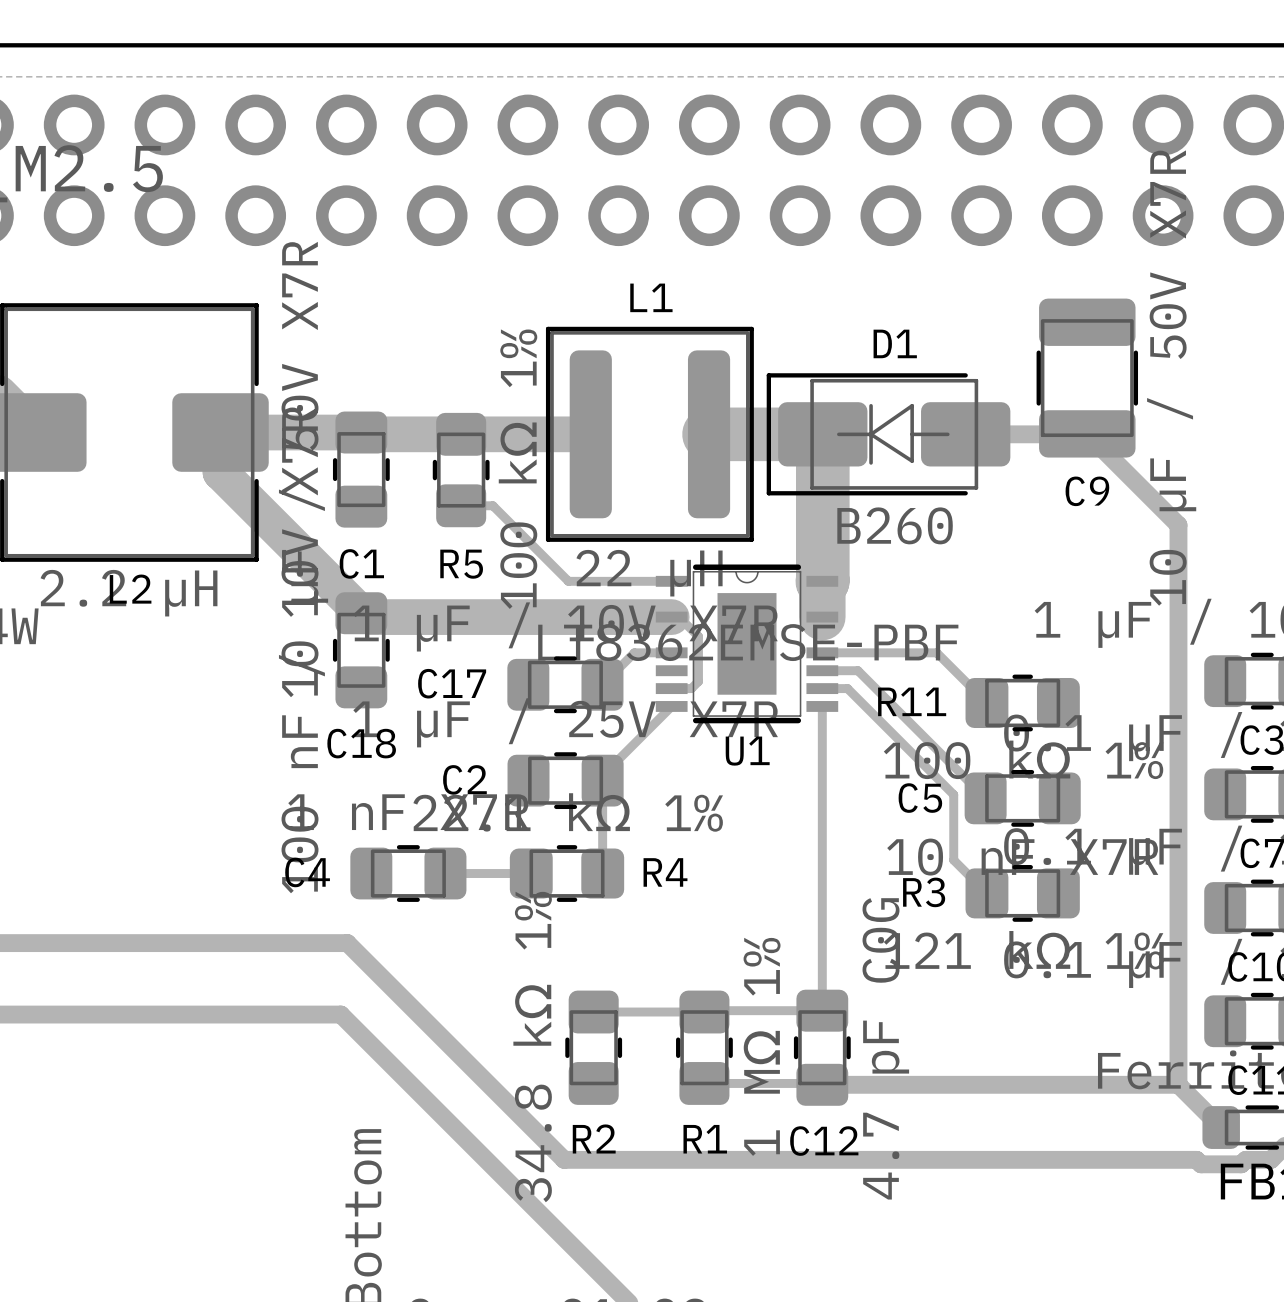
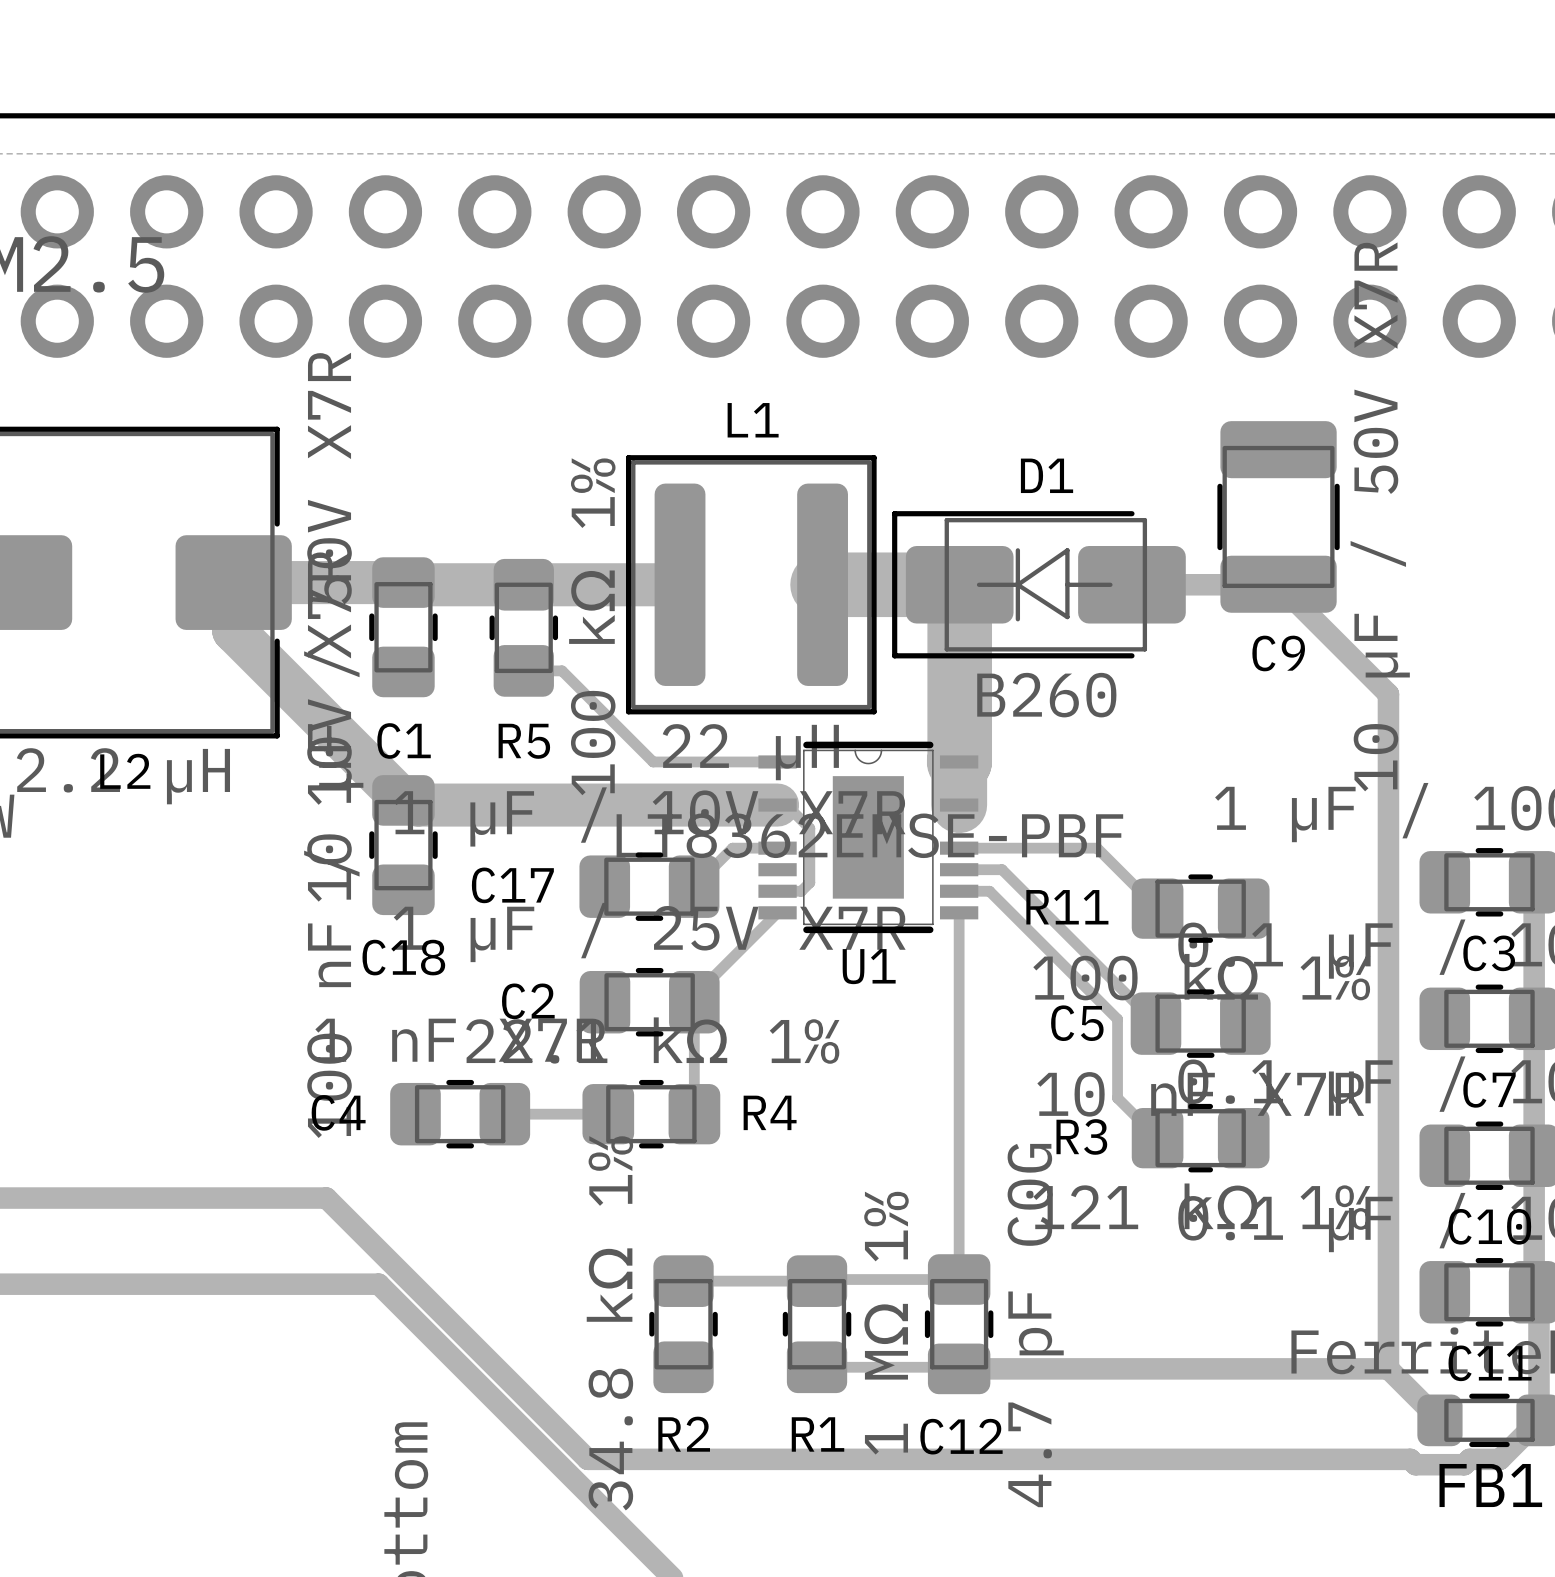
track: (297, 943) (347, 943) (564, 1159) -> (326, 1198) (587, 1459) (647, 1459)

